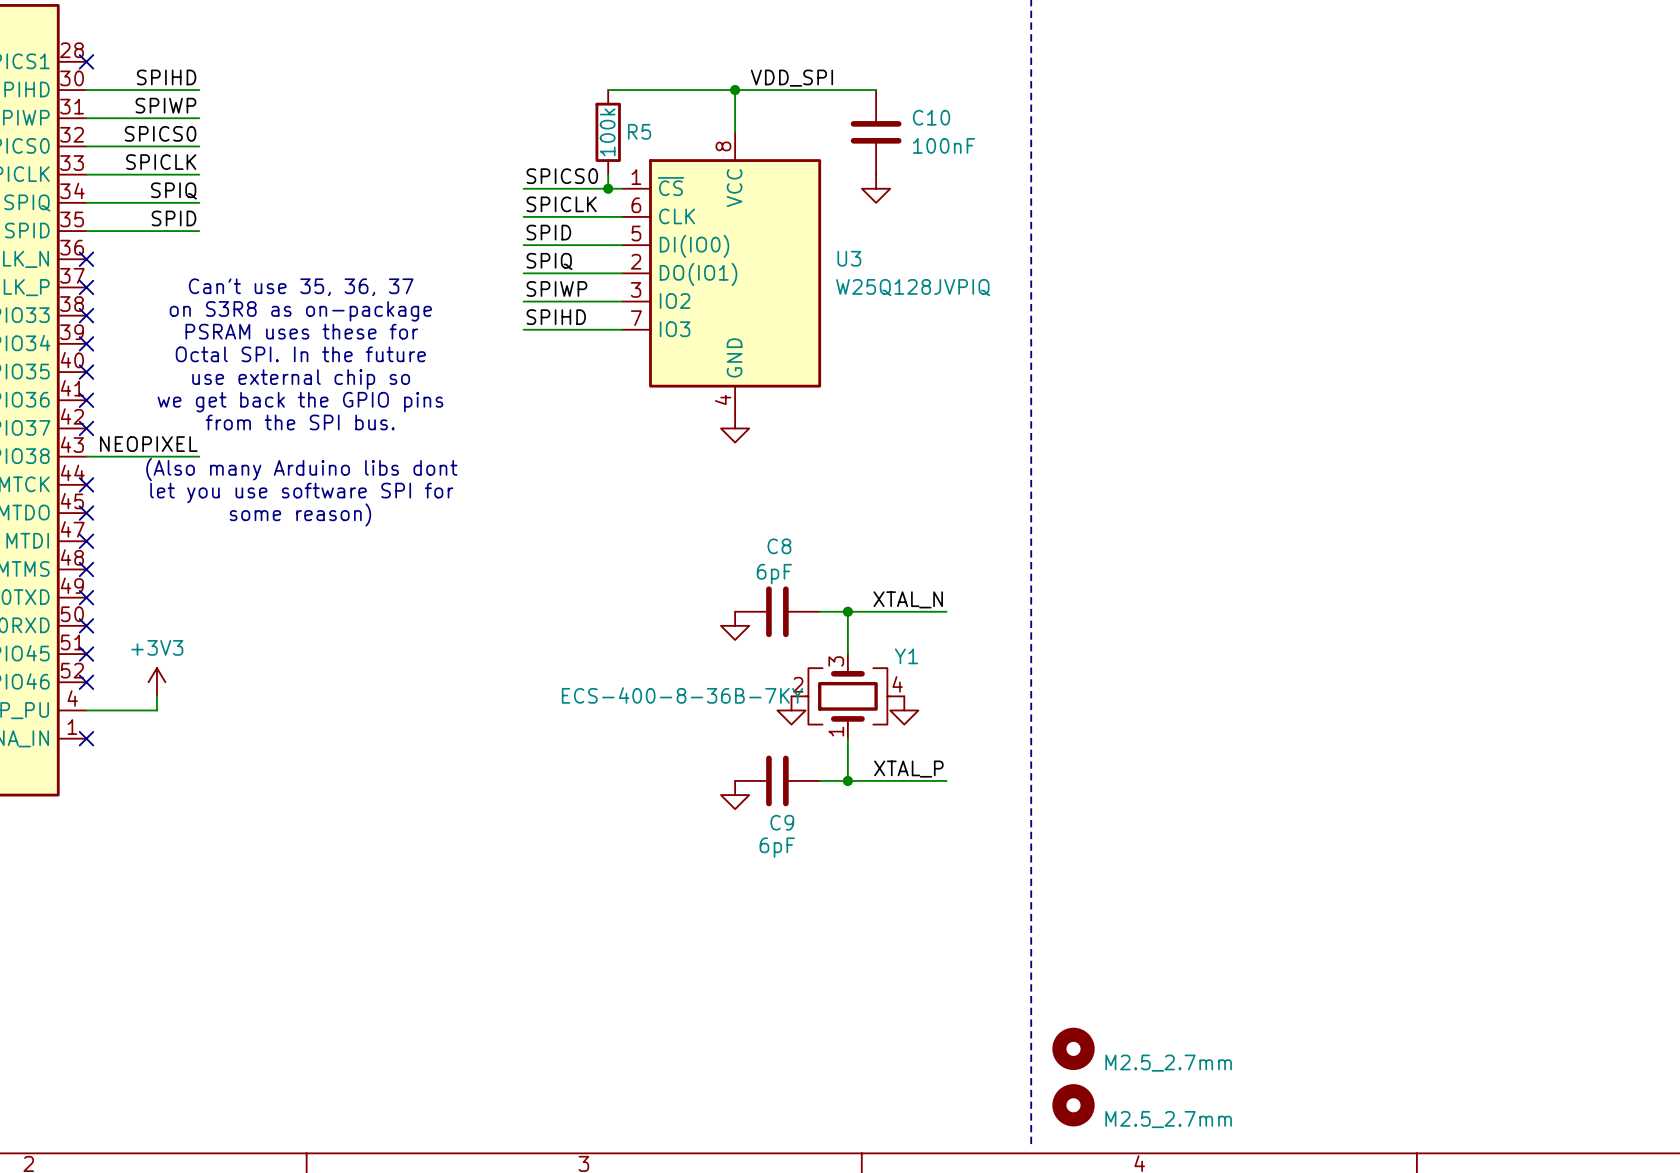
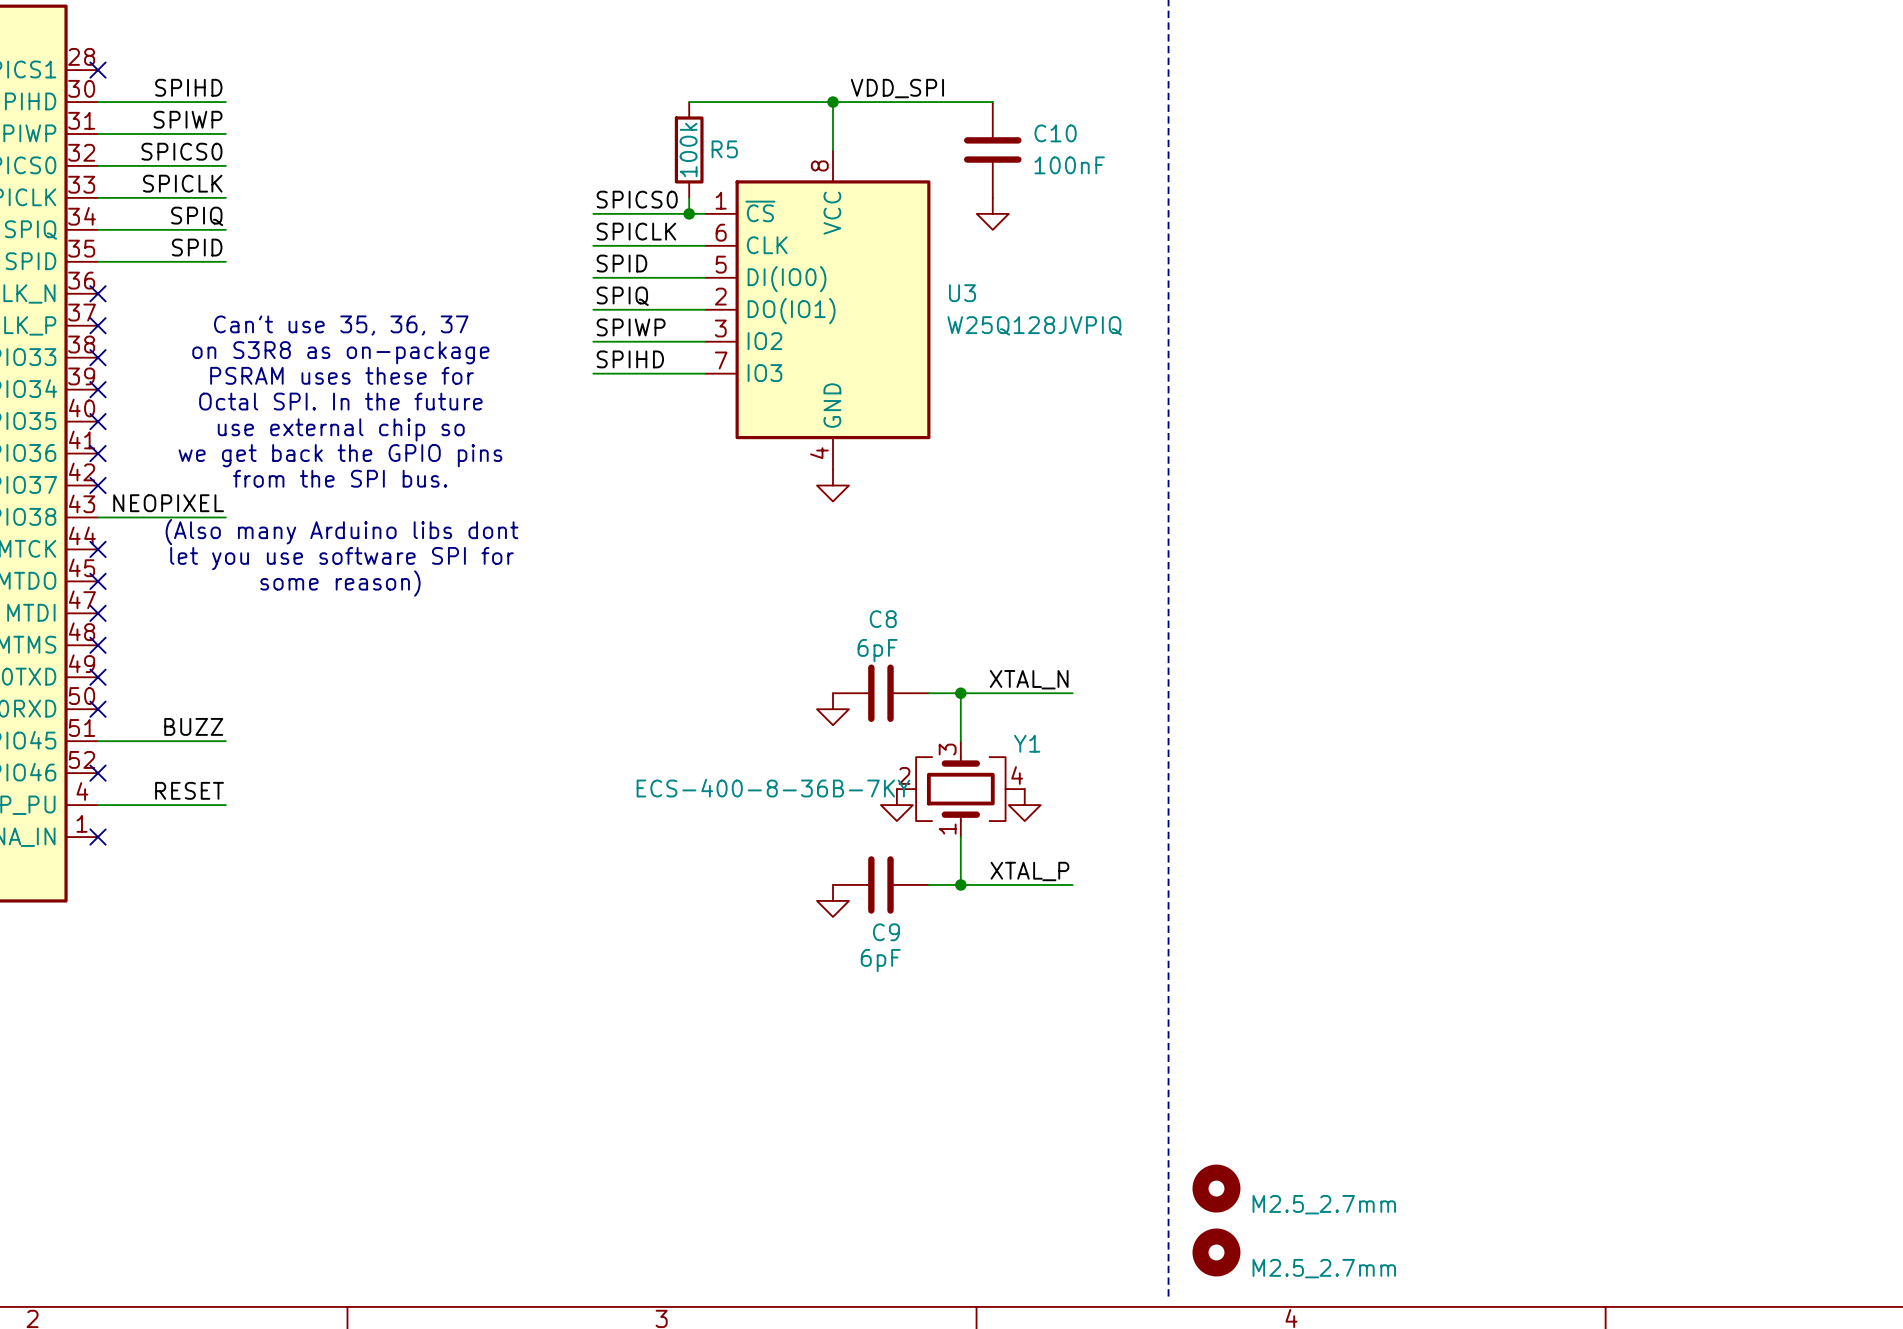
label: none -> BUZZ (193, 726)
wire: none -> (97, 741) (225, 741)
no-connect mark: (86, 654) -> none
power symbol: +3V3 (156, 682) -> none
wire: (156, 696) (156, 710) -> (225, 805) (177, 805)
label: none -> RESET (189, 790)

